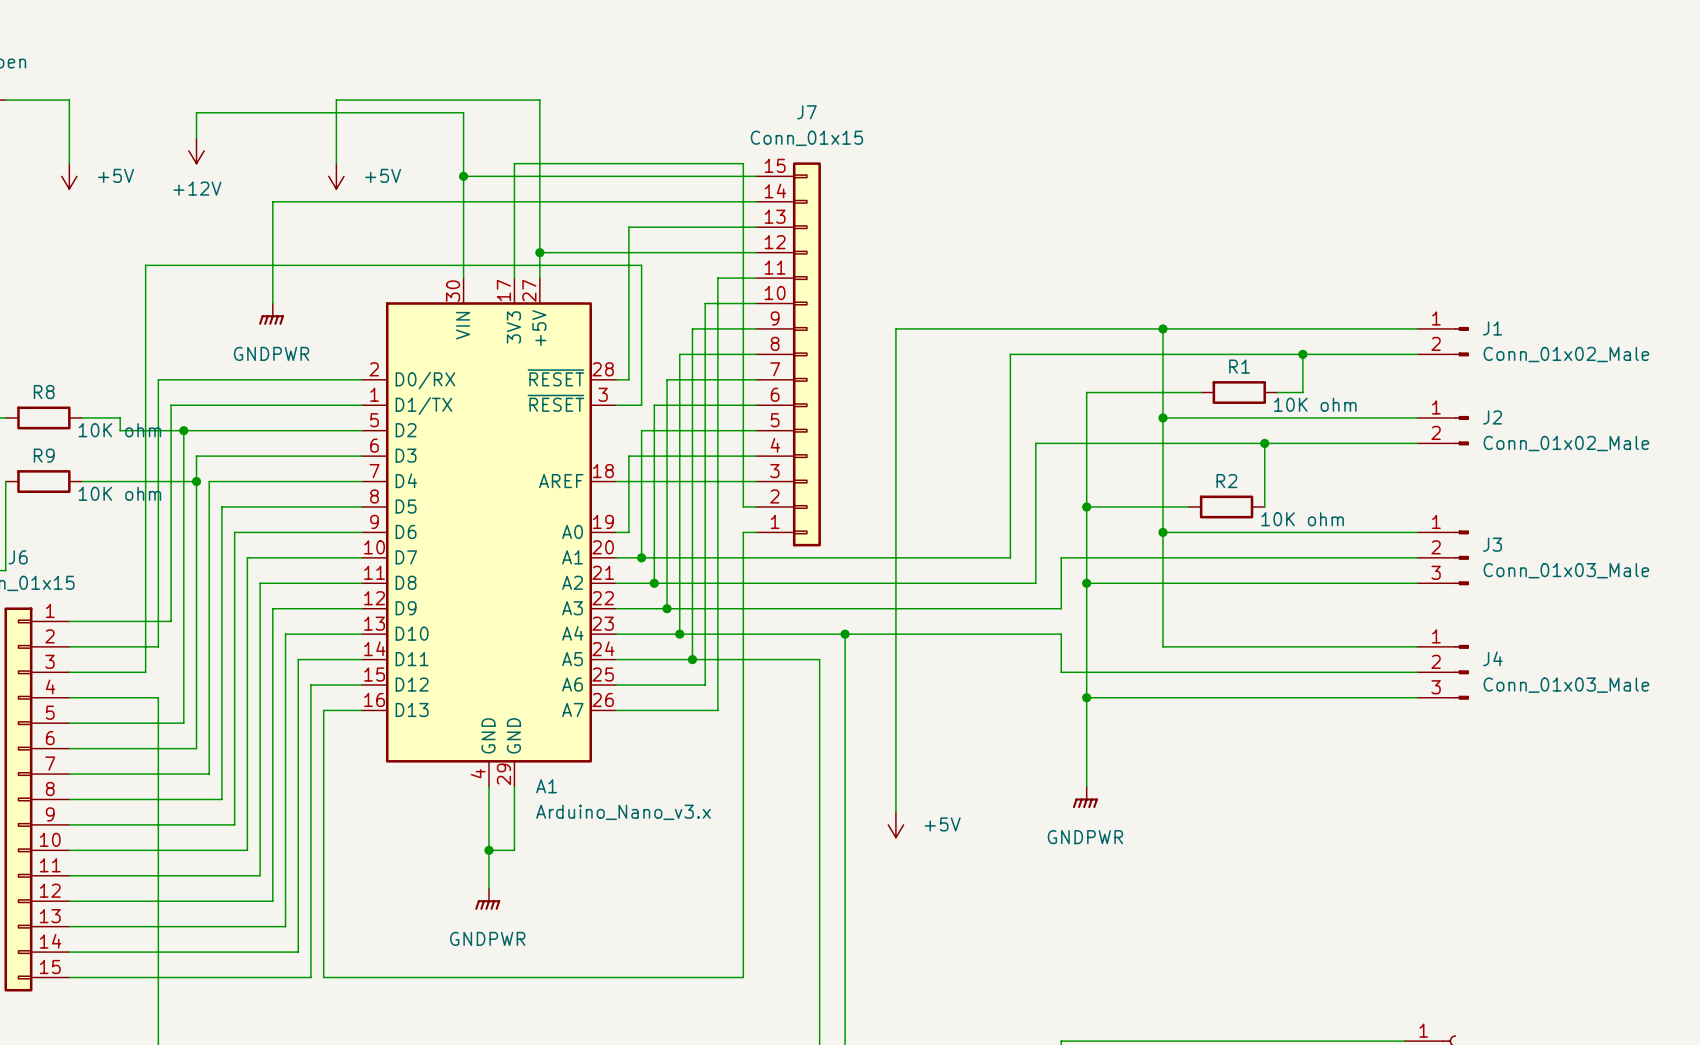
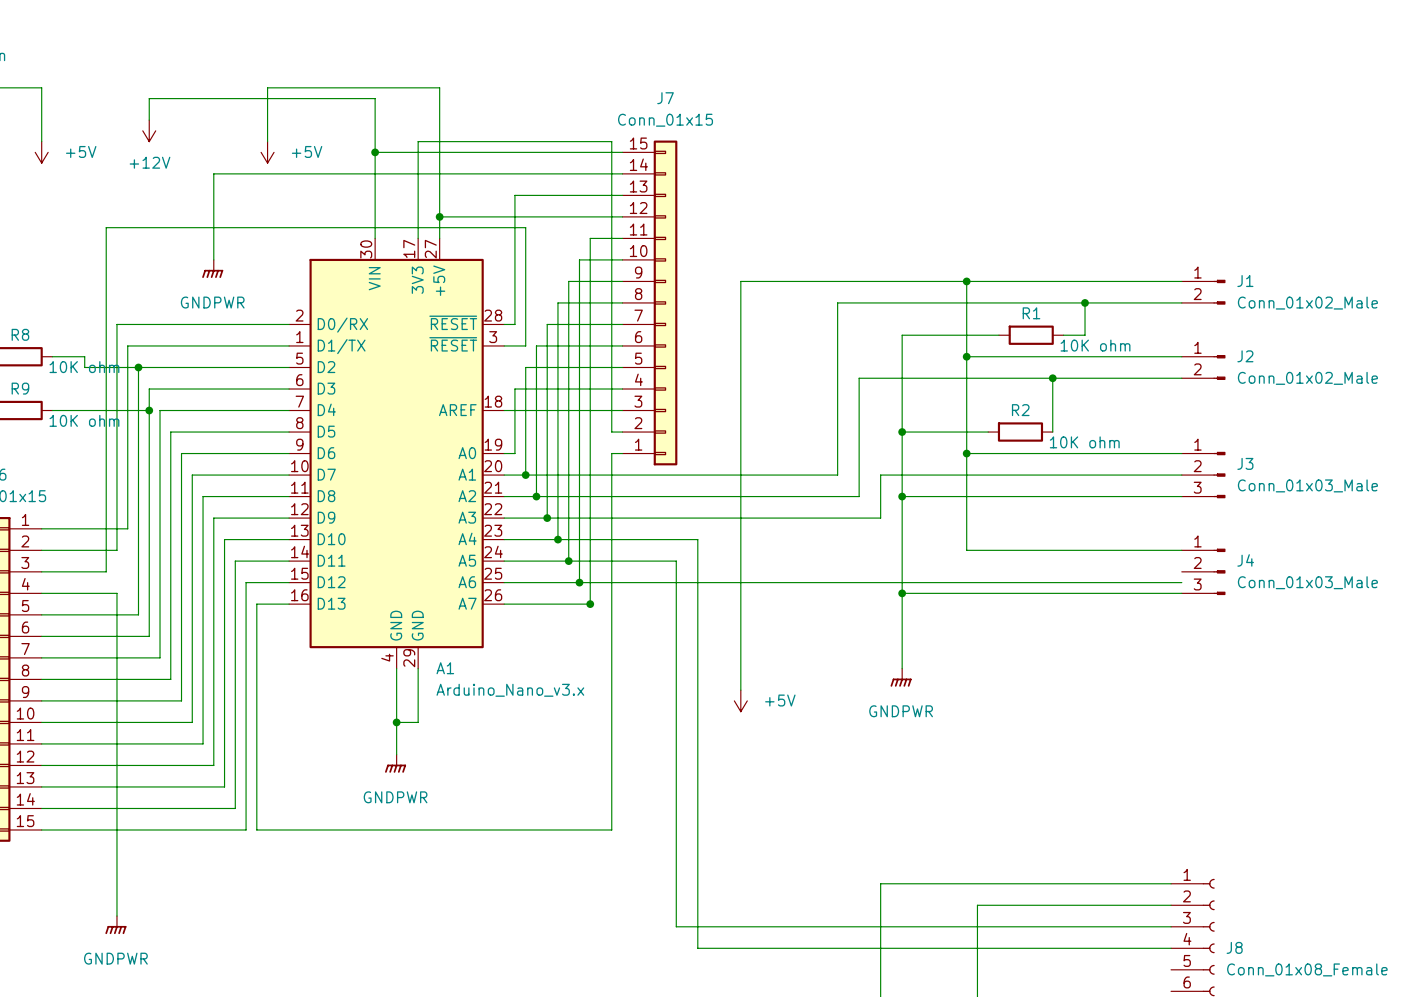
wire: (845, 634) (1061, 634) (1061, 672) (1417, 672) -> none
junction: (845, 634) -> none
wire: none -> (579, 582) (1181, 582)
junction: none -> (579, 582)
junction: none -> (590, 604)

